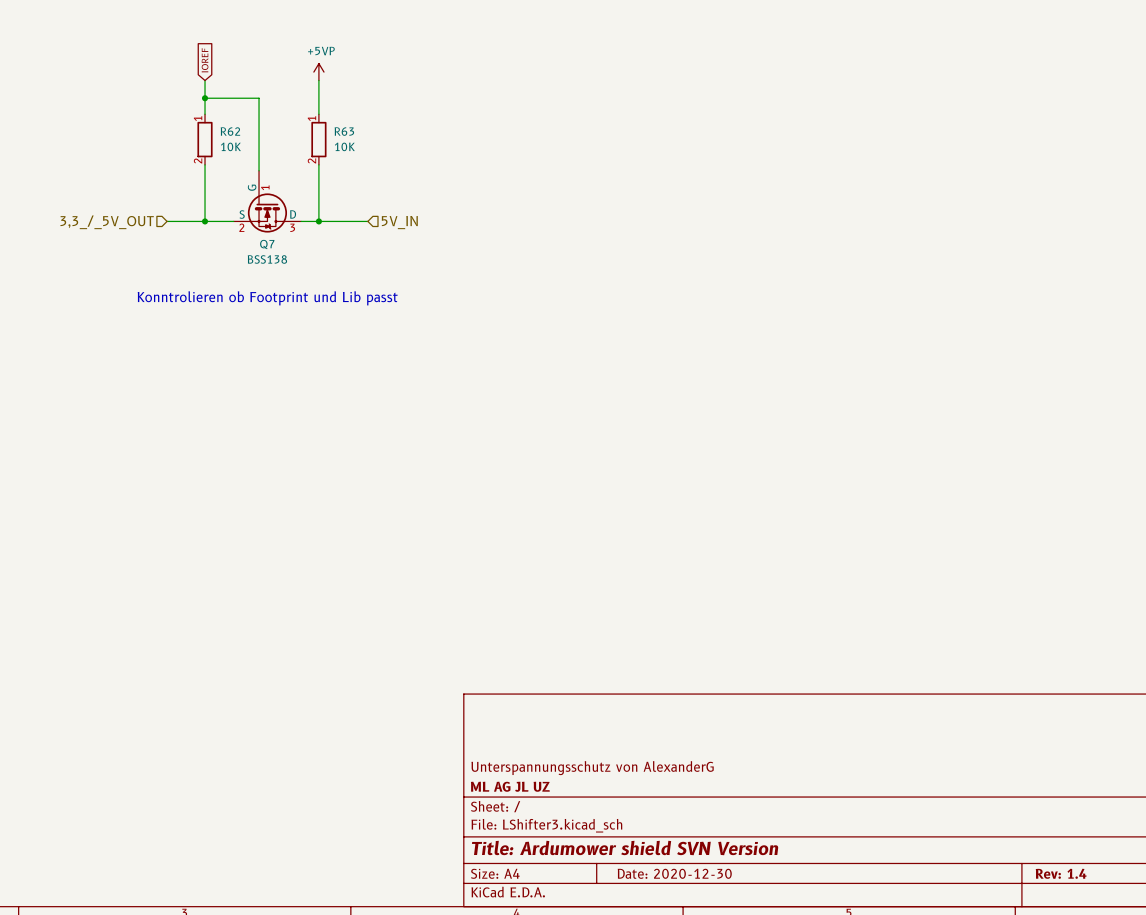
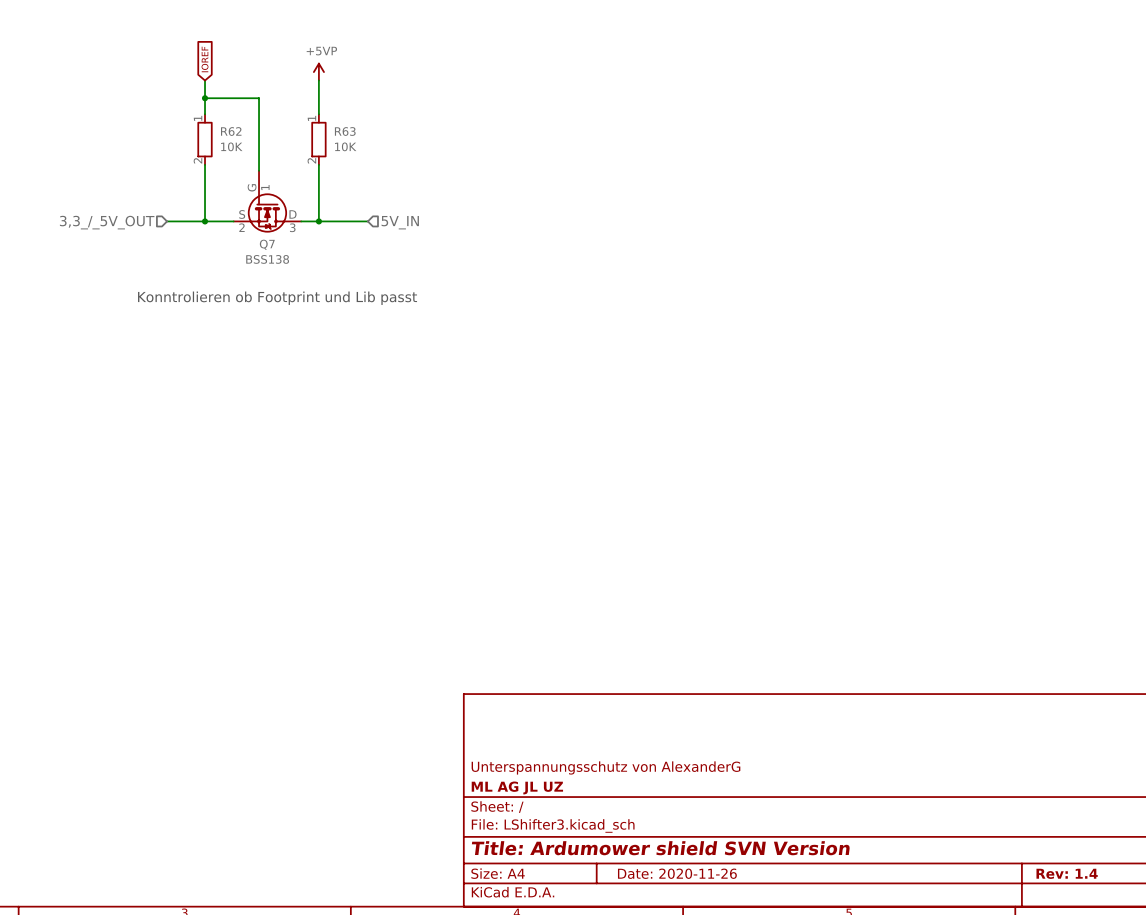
title block: Date: 2020-12-30 (674, 873) -> Date: 2020-11-26 (677, 873)

